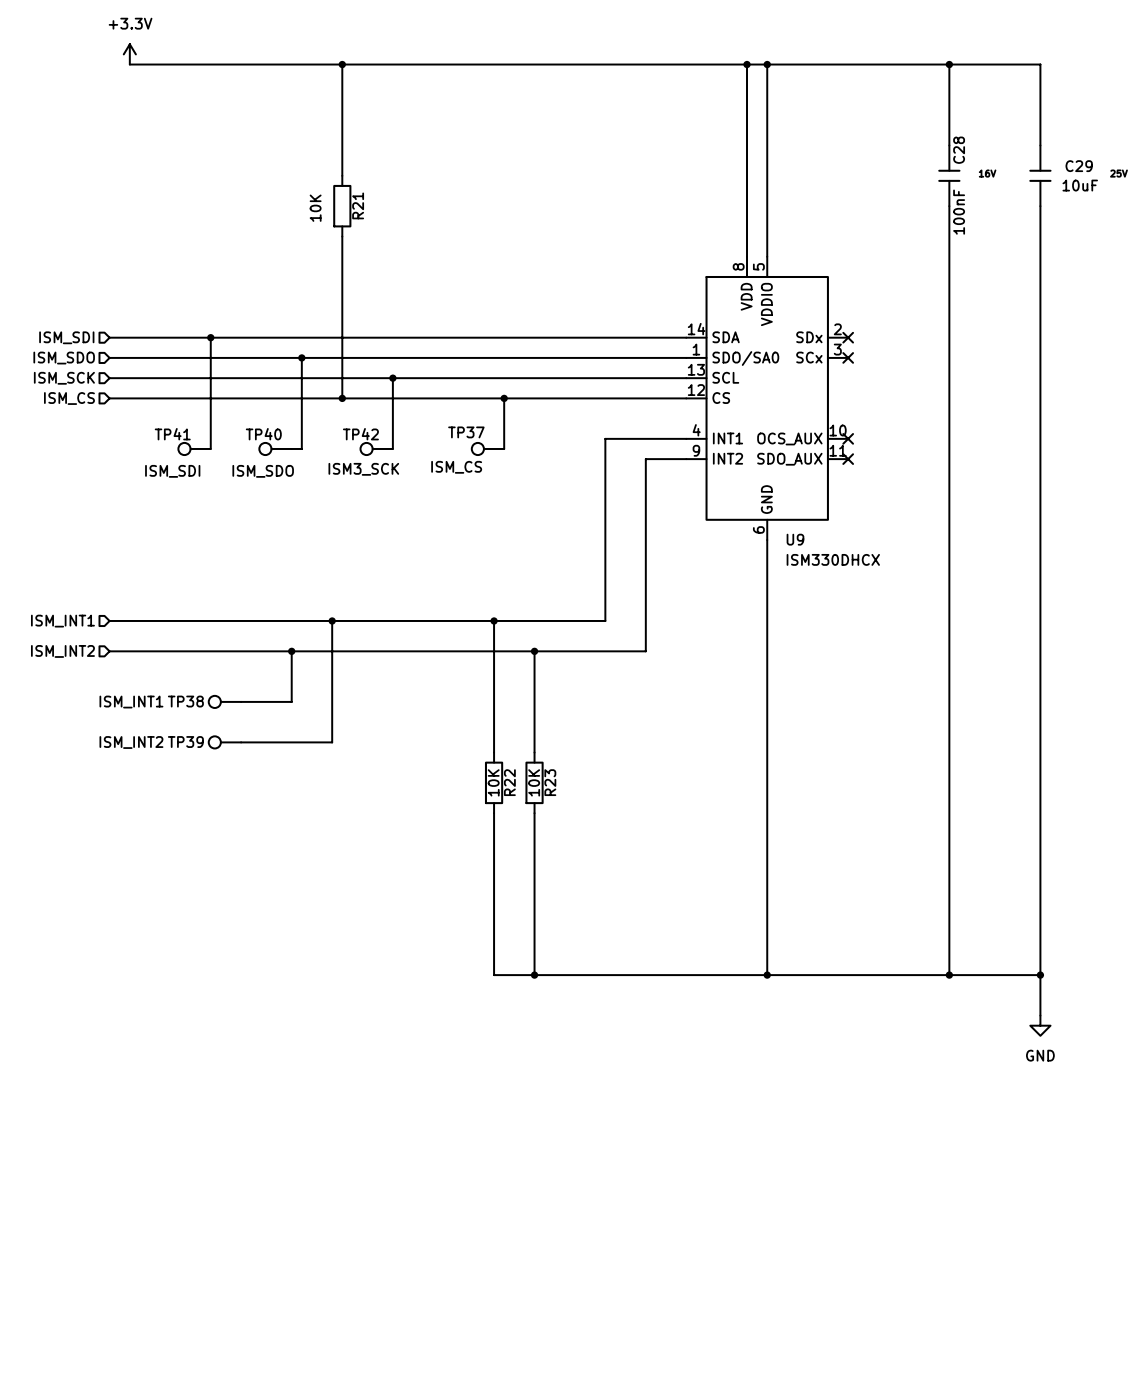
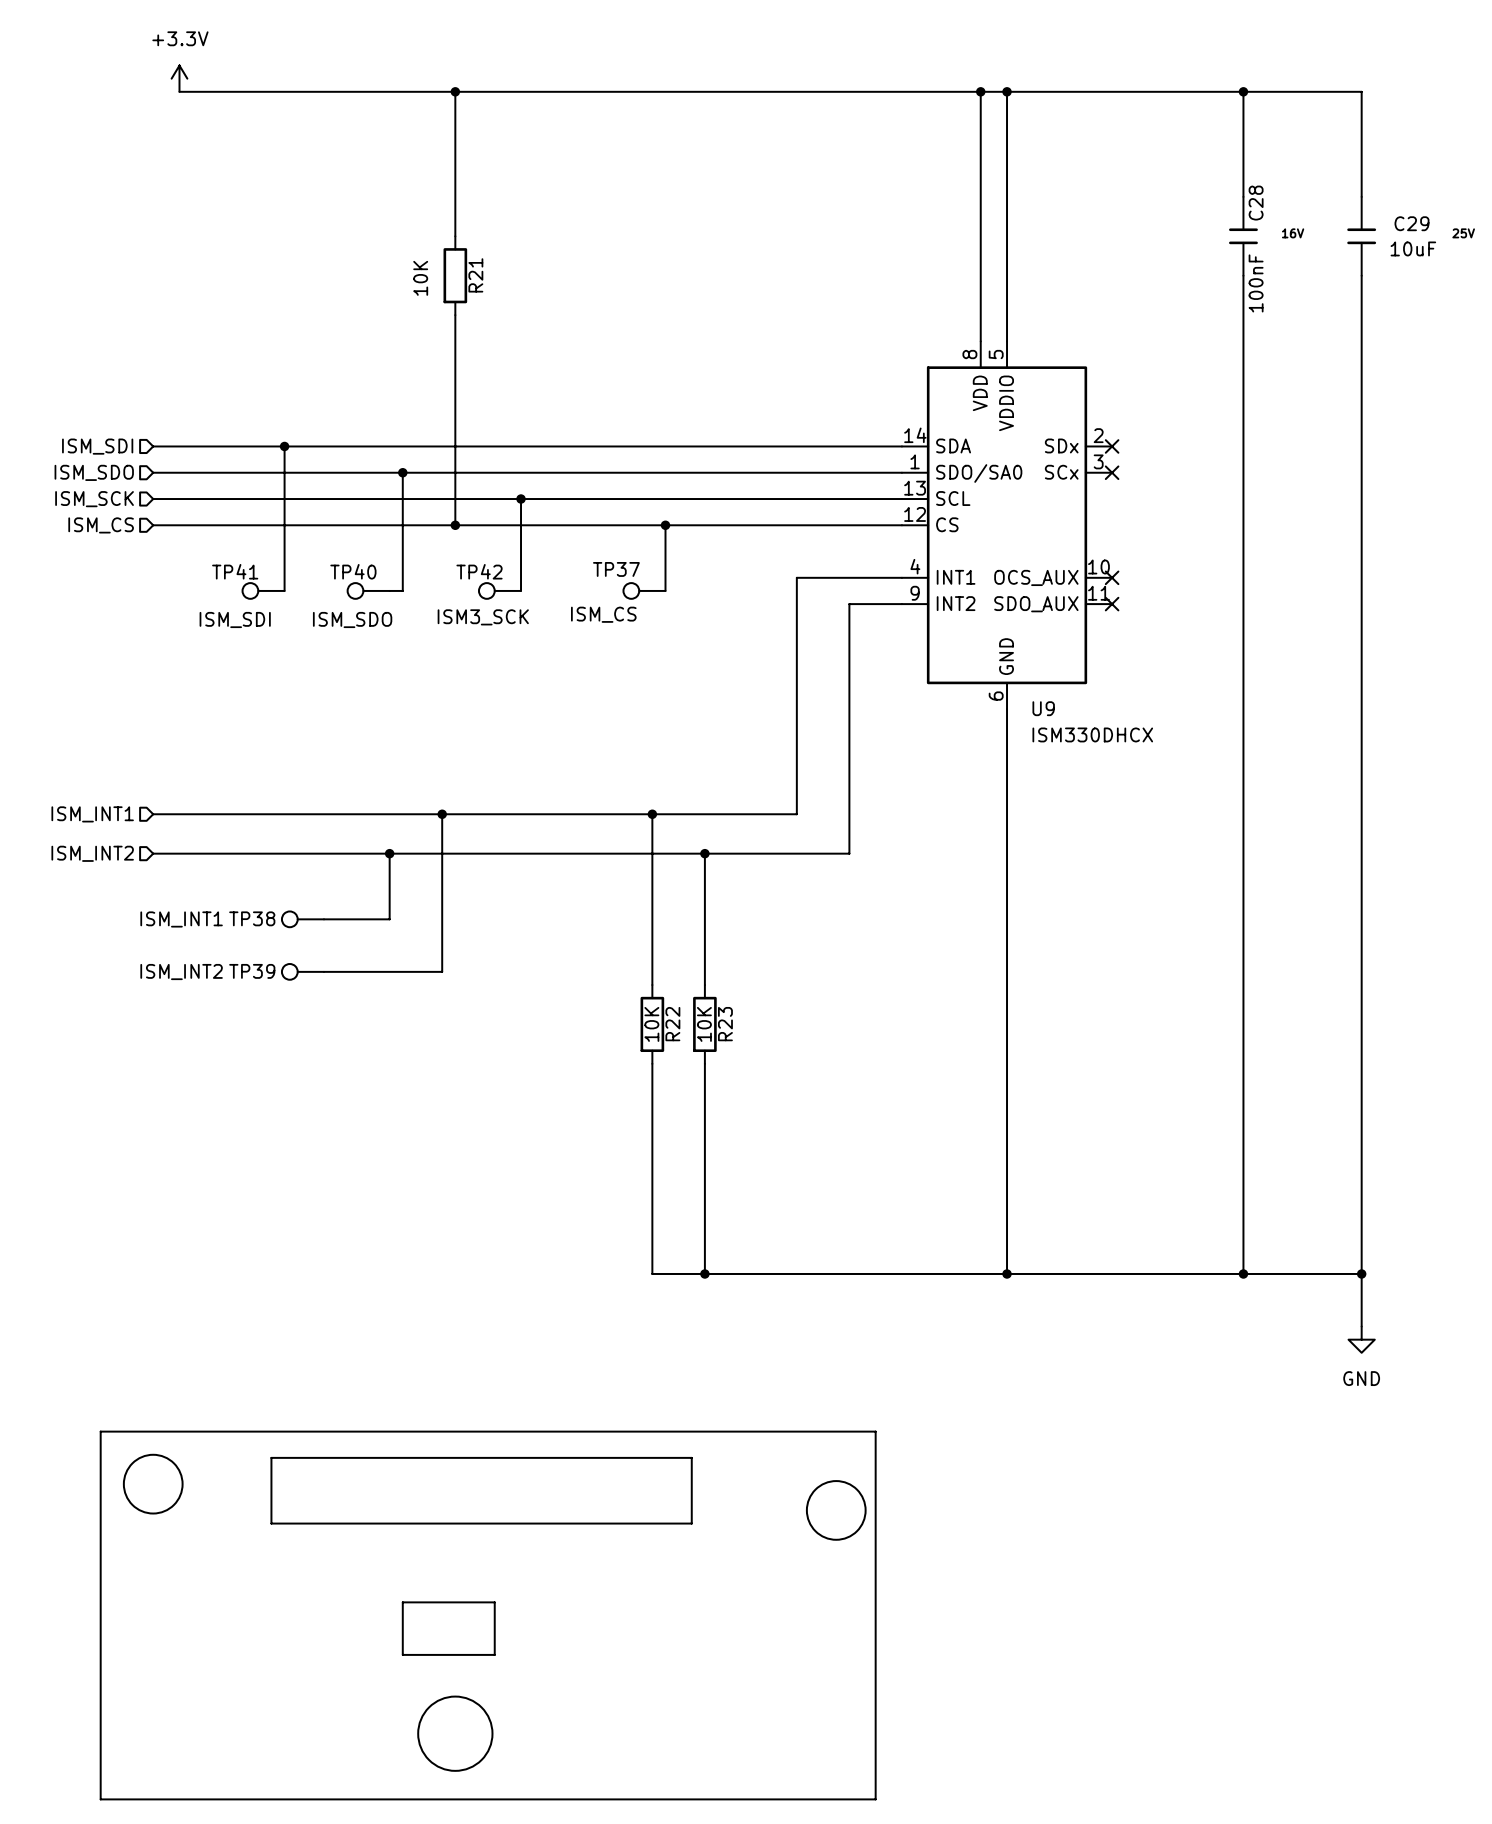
line: none -> (100, 1431) (875, 1431) (875, 1799) (100, 1799) (100, 1431)
drawing: none -> [123, 1454, 183, 1514]
line: none -> (271, 1457) (691, 1457) (691, 1523) (271, 1523) (271, 1457)
drawing: none -> [806, 1481, 866, 1540]
line: none -> (402, 1602) (494, 1602) (494, 1654) (402, 1654) (402, 1602)
drawing: none -> [418, 1696, 493, 1771]

